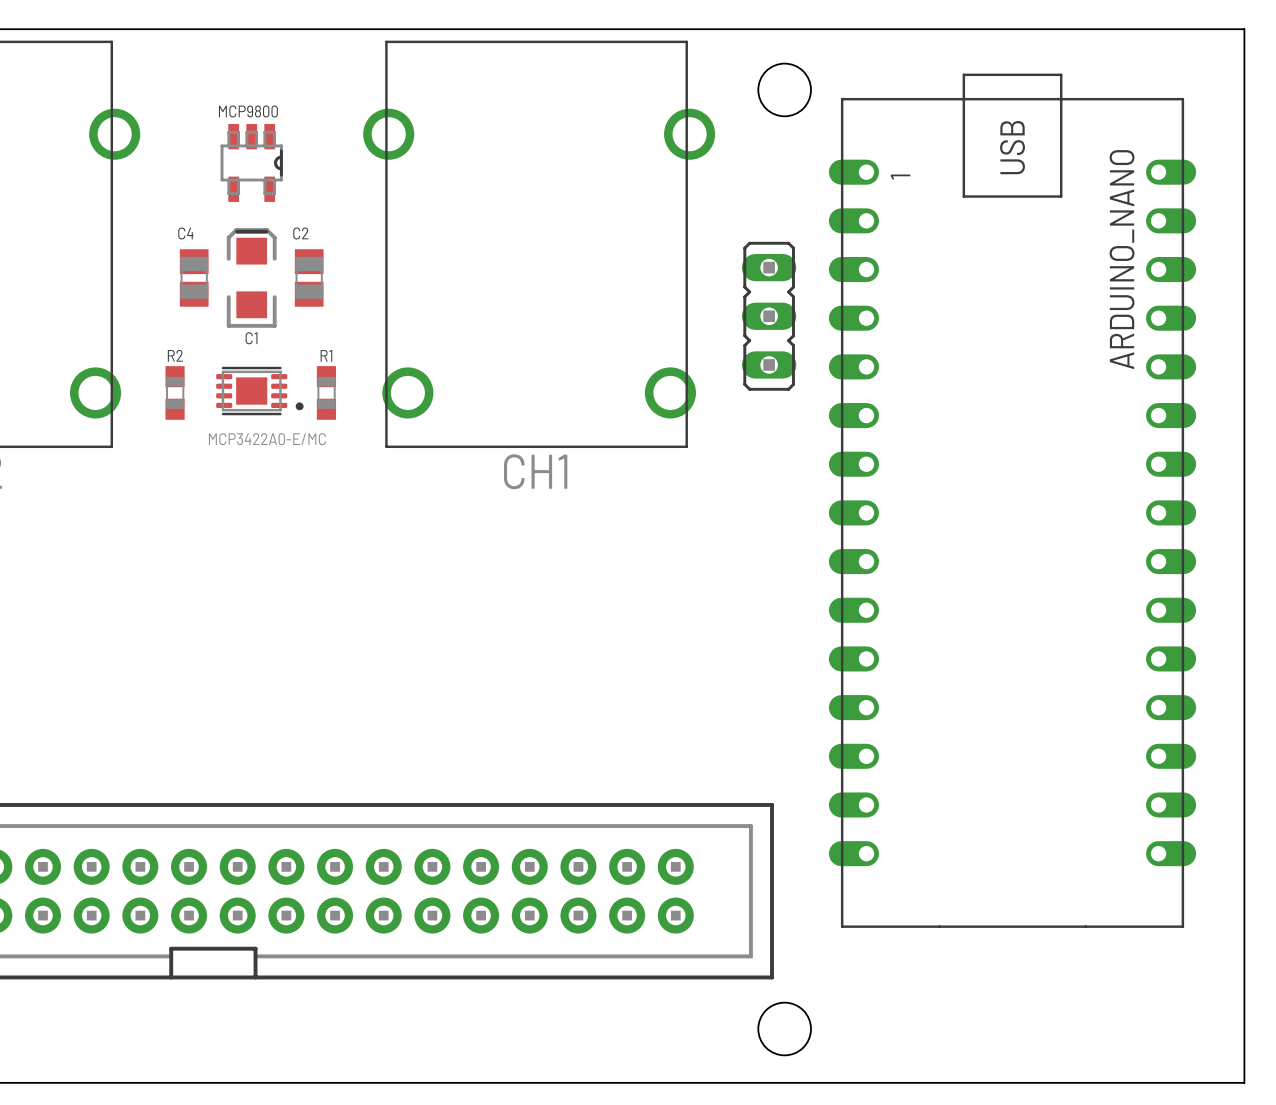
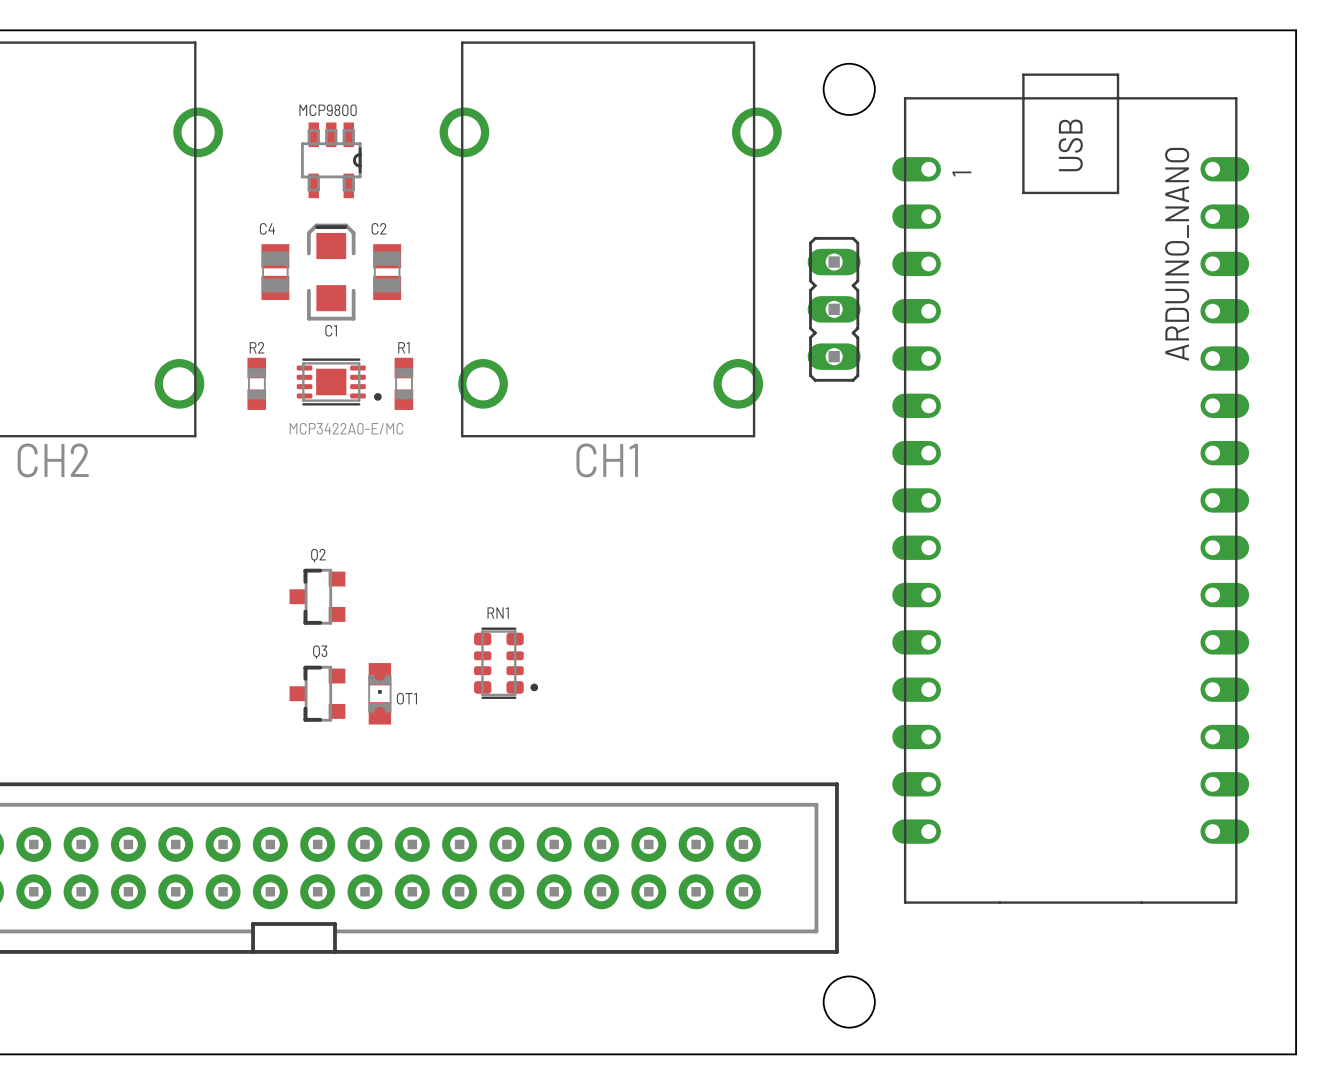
Q2: none -> (317, 596)
RN1: none -> (506, 663)
Q3: none -> (317, 693)
OT1: none -> (379, 693)

